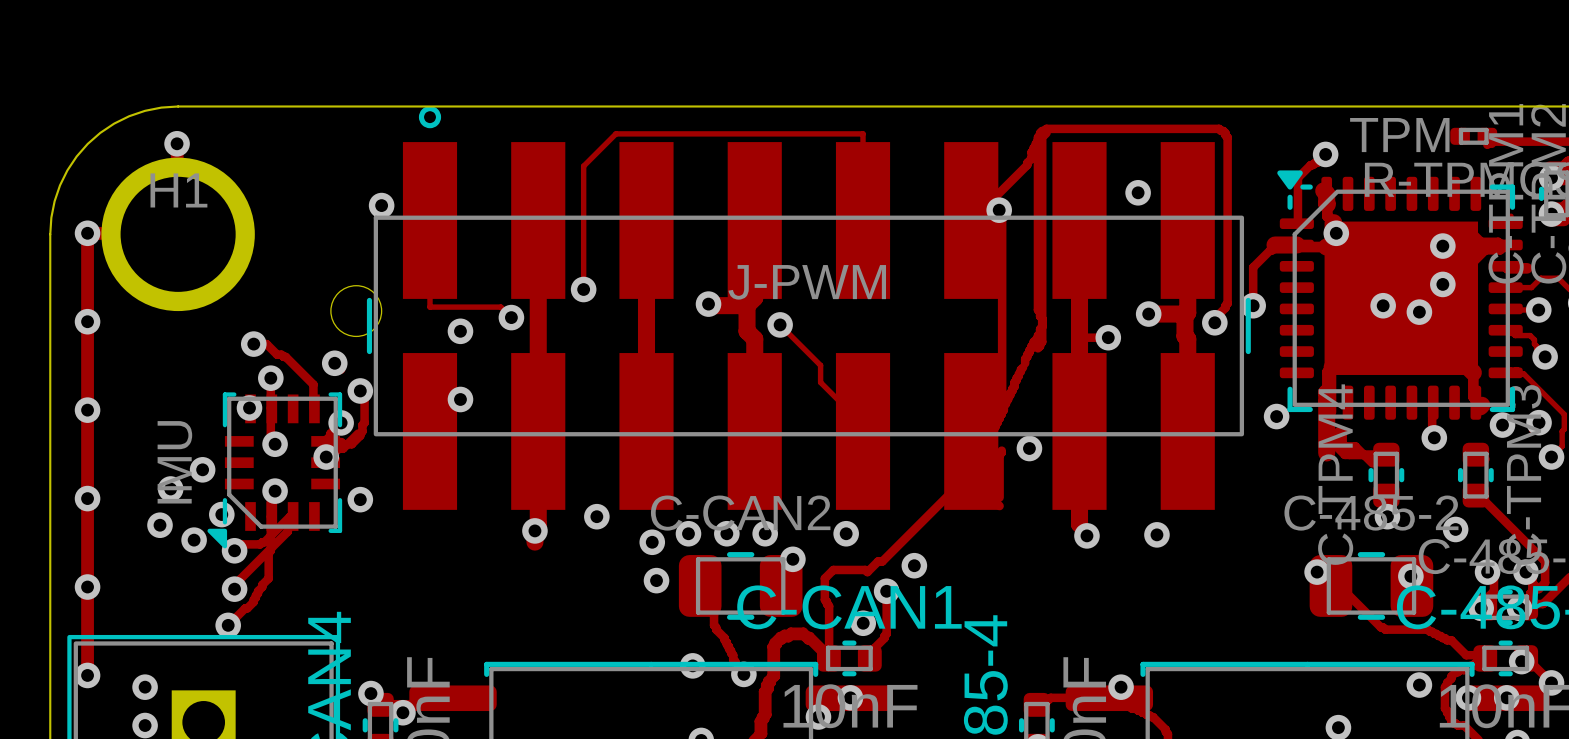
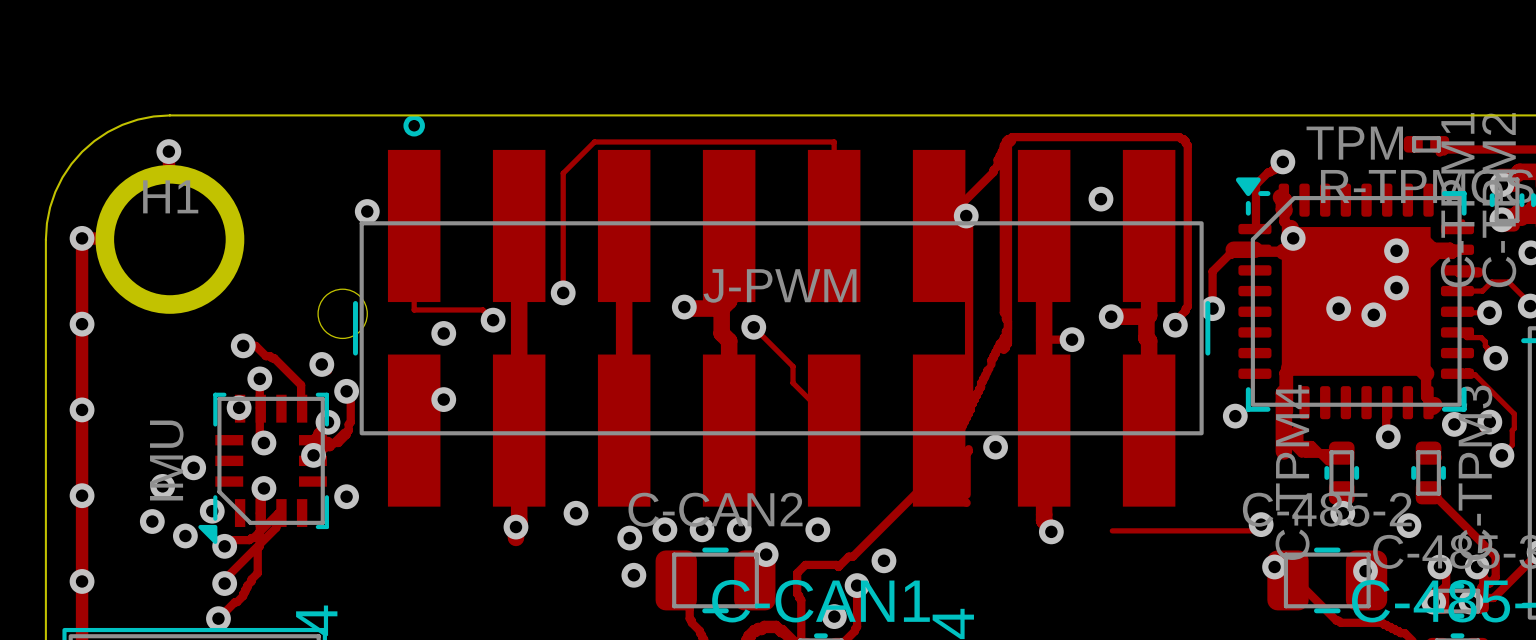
track: none -> (1261, 524) (1254, 530) (1119, 530)
via: none -> (1261, 524)
via: (1156, 534) -> none

